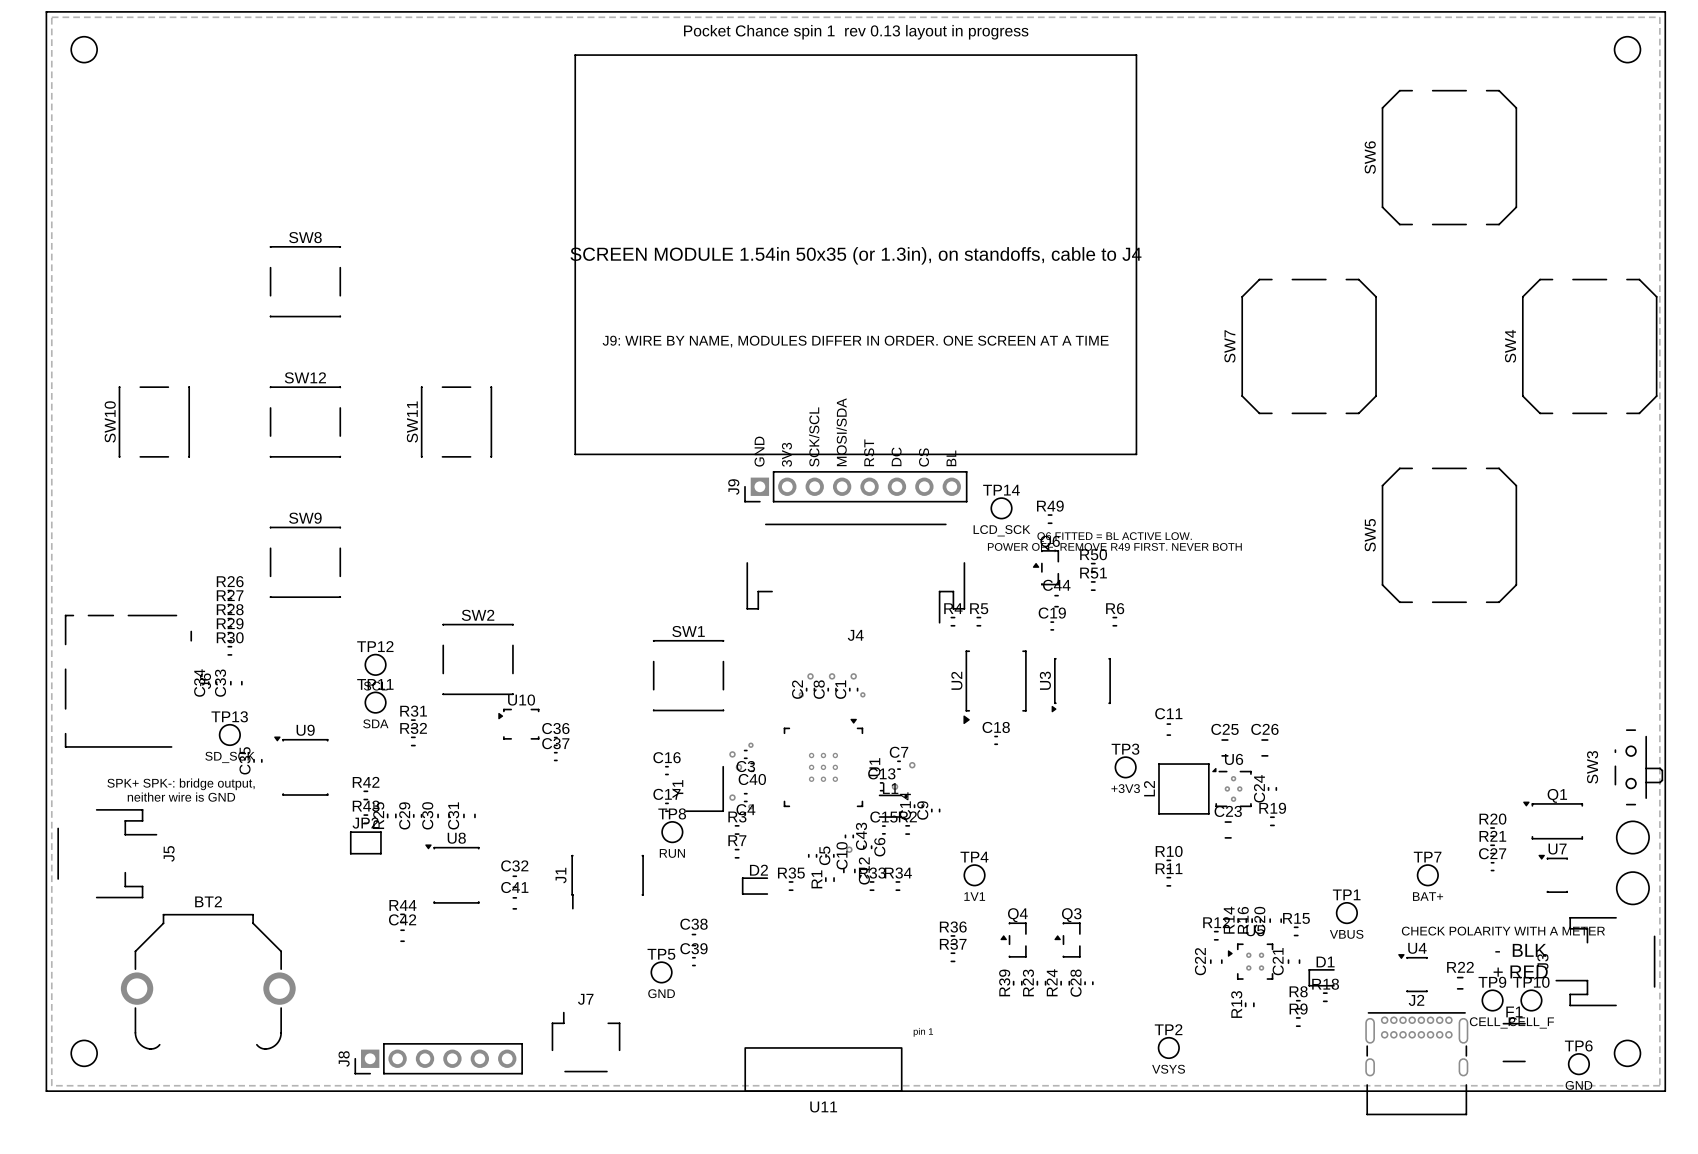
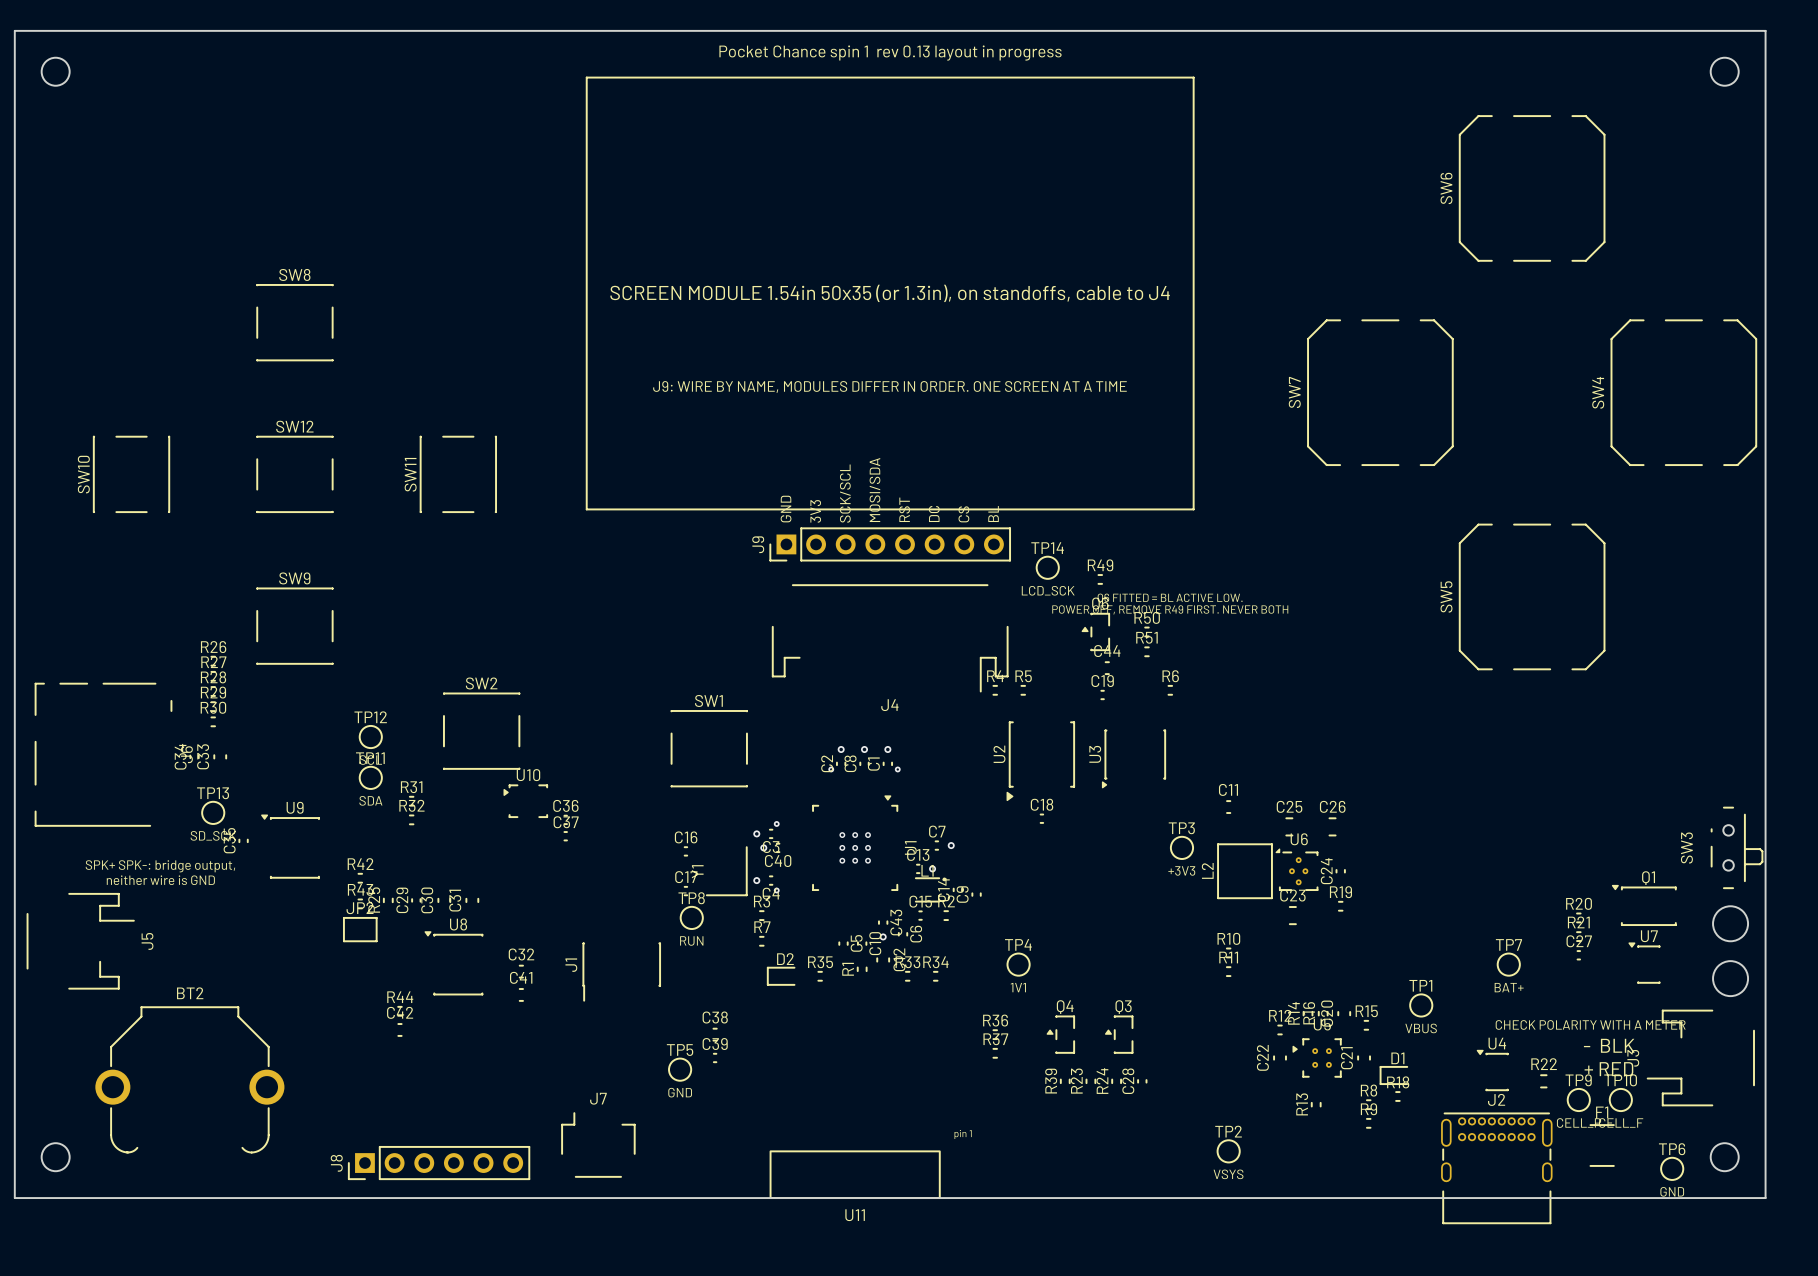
zone outline: (51, 17) (1659, 17) (1659, 1085) (51, 1085) (51, 17) -> none

